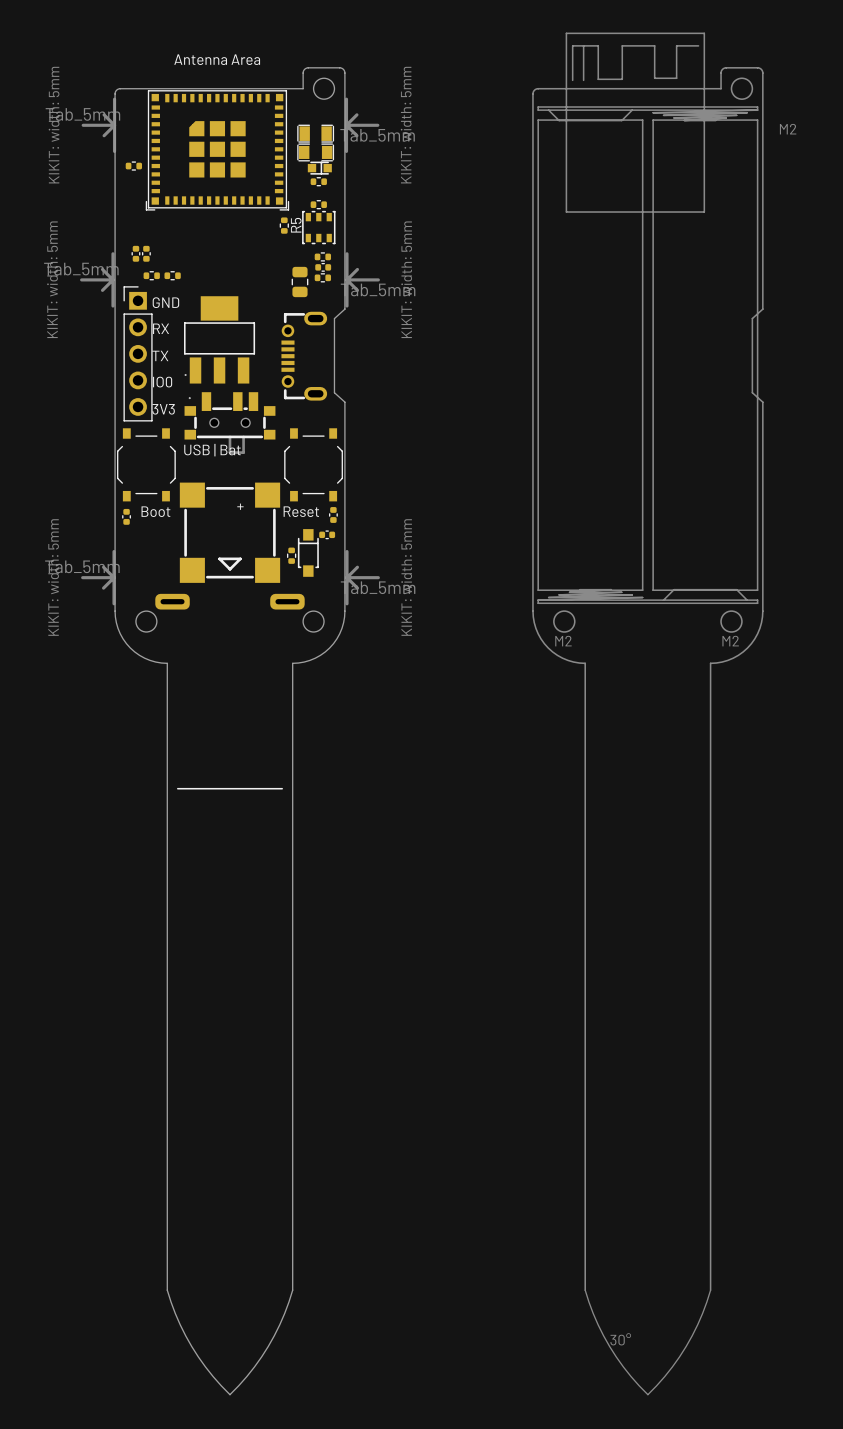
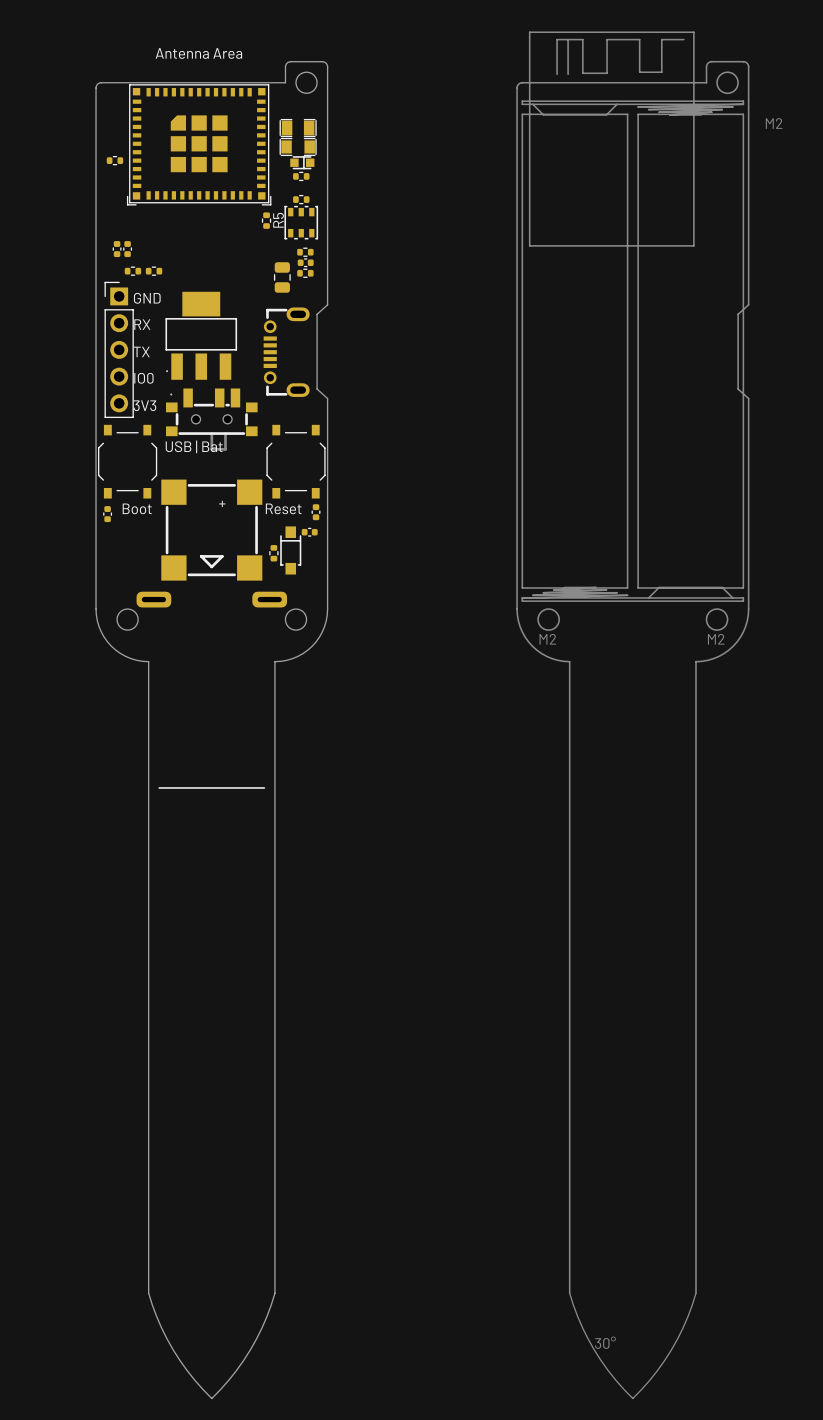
line: (566, 33) (566, 212) (704, 212) (704, 33) (566, 33) -> (529, 32) (529, 245) (693, 245) (693, 32) (529, 32)
drawing: [80, 97, 117, 308] -> none
drawing: [344, 97, 380, 308] -> none
drawing: [81, 549, 116, 606] -> none
drawing: [345, 549, 380, 606] -> none

